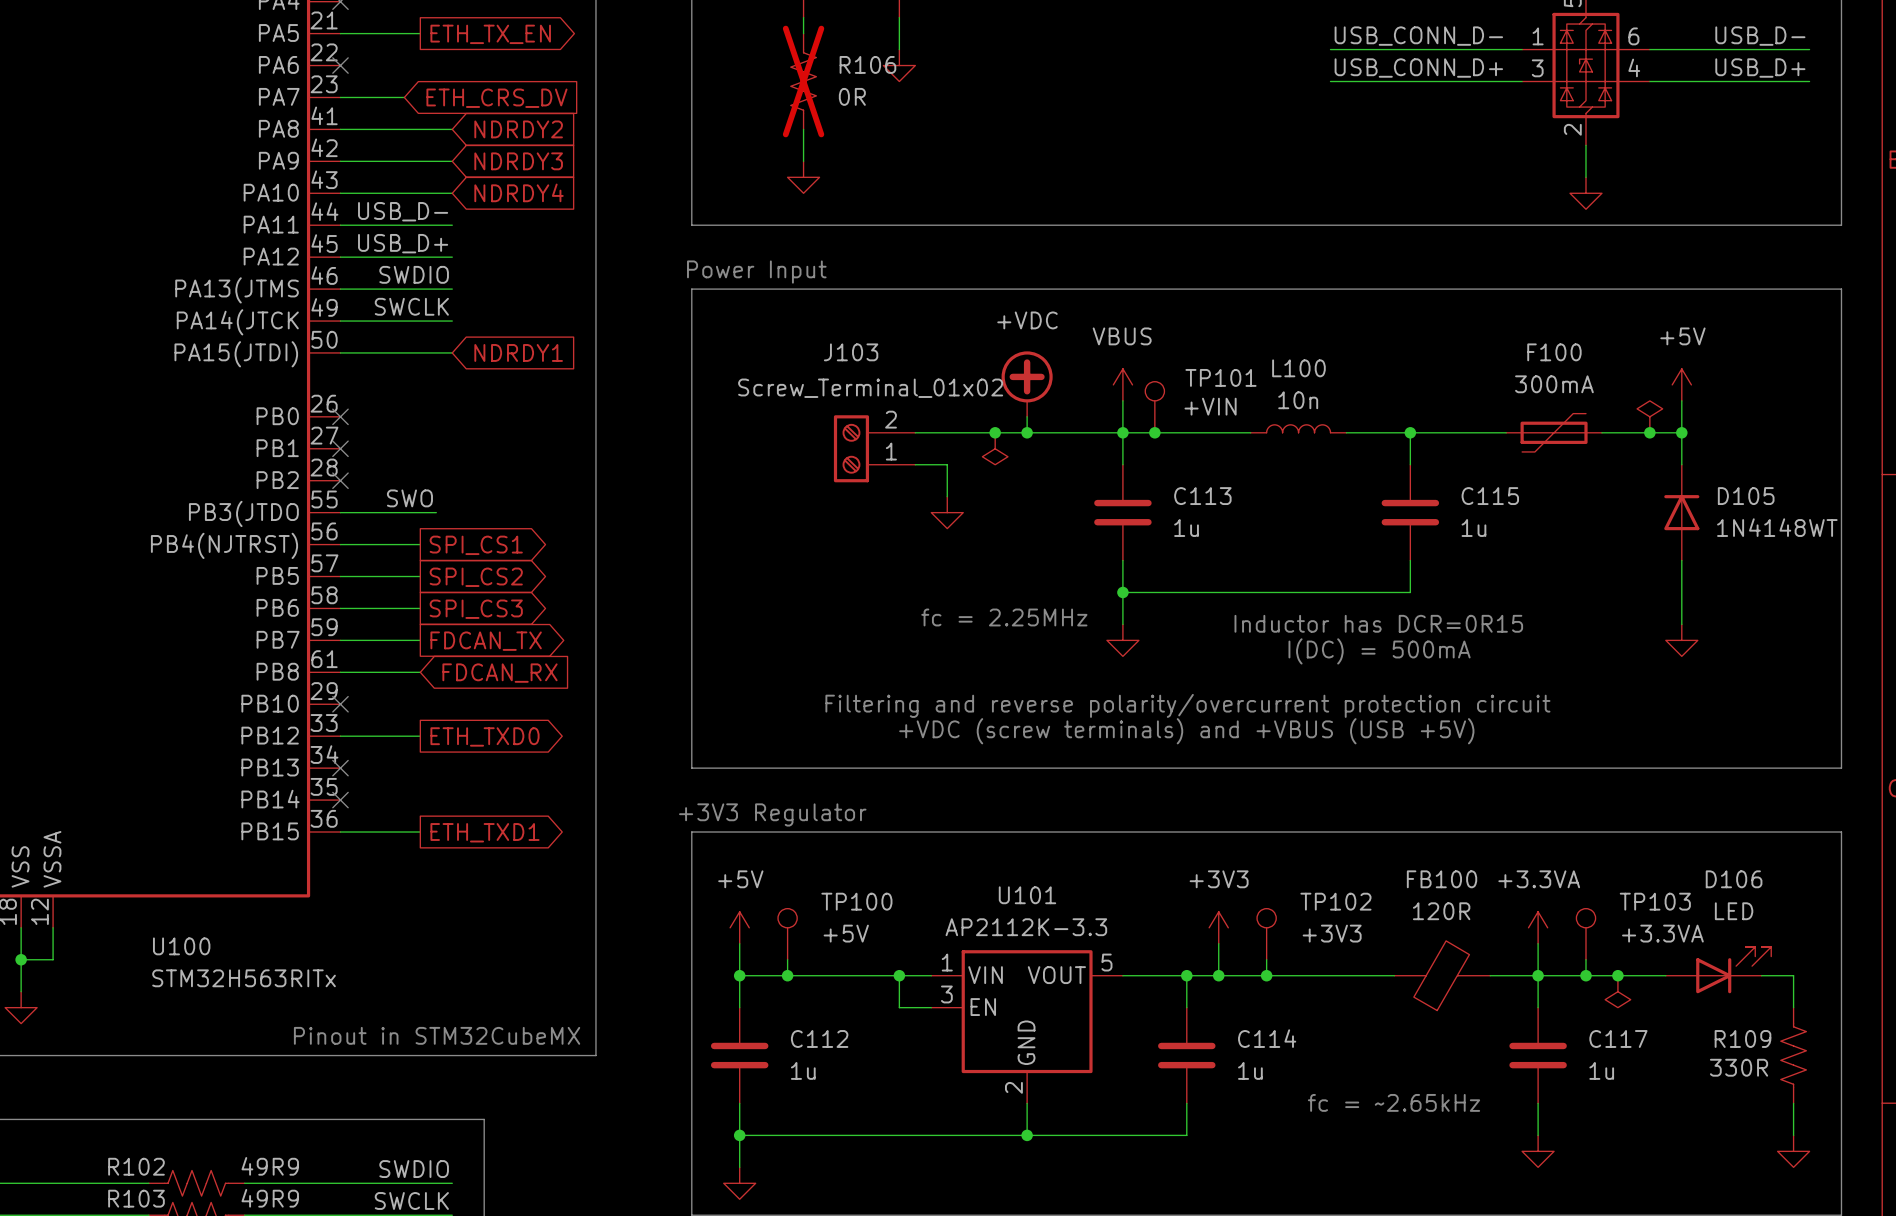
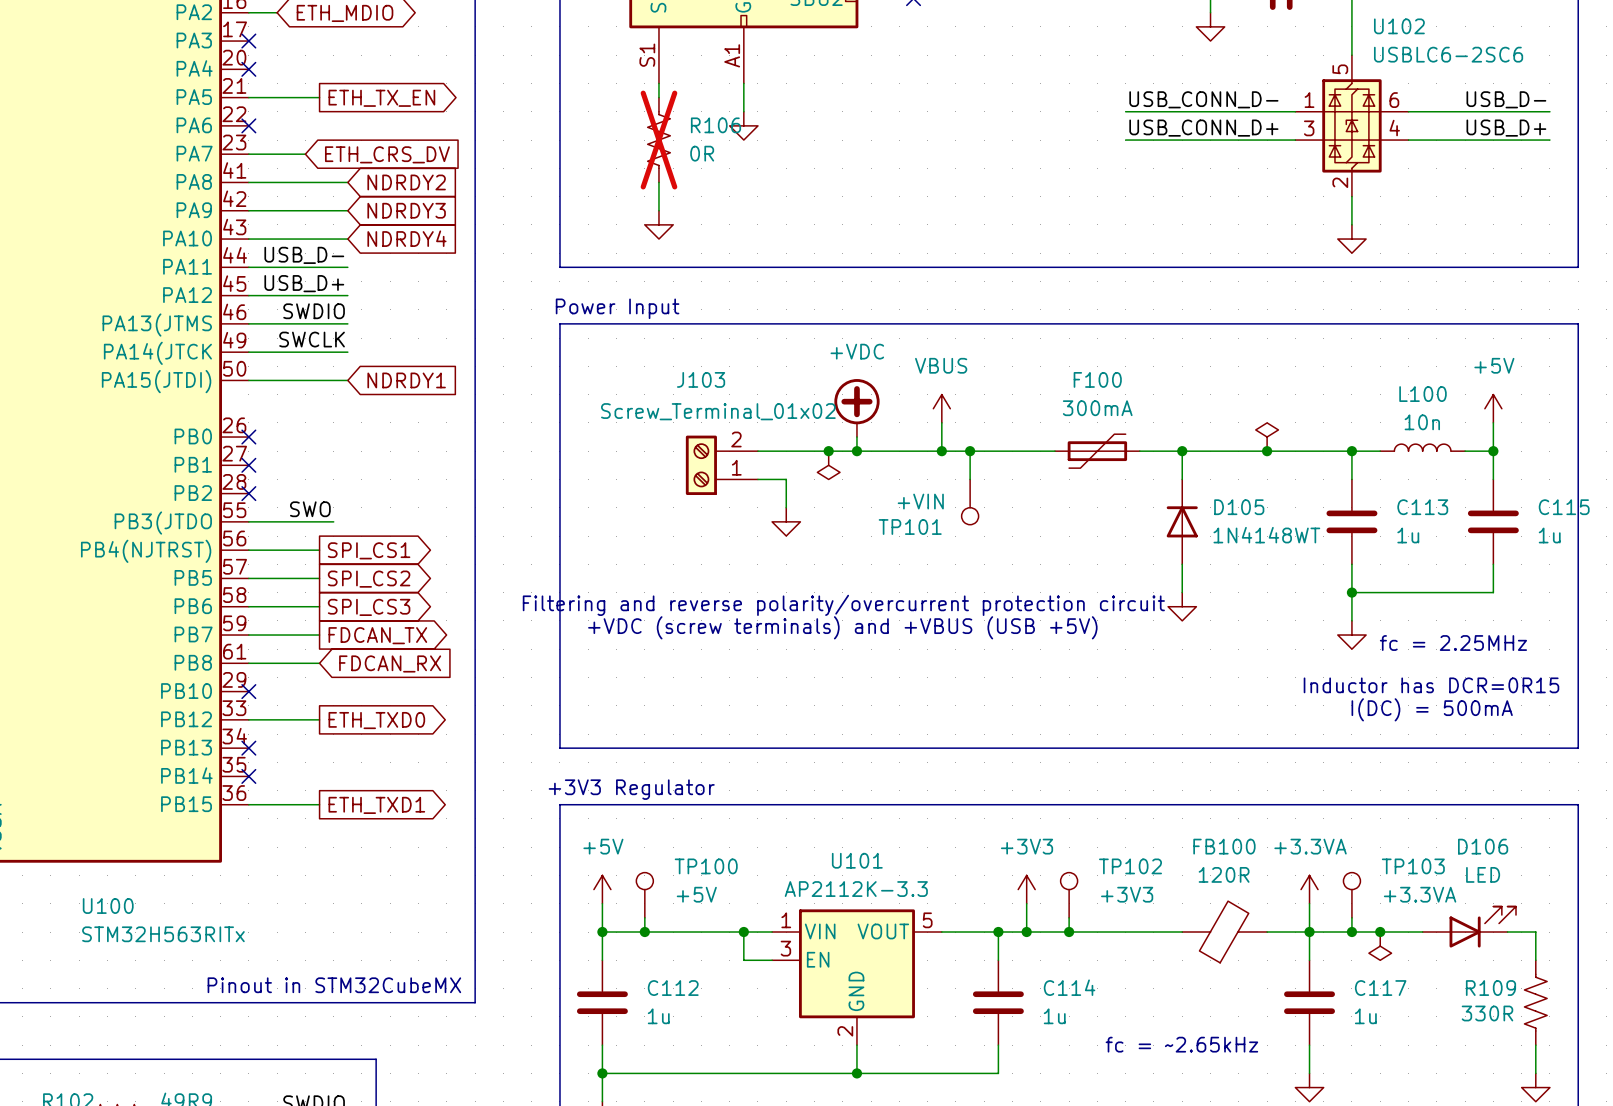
power symbol position: +5V (1681, 384) -> +5V (1493, 408)
TP101 rotation: 0° (1154, 391) -> 180° (970, 516)
wire: (1681, 400) (1681, 464) -> (1493, 422) (1493, 479)
TP101 position: (1154, 407) -> (970, 502)
power symbol position: (1649, 416) -> (1267, 437)
L100 position: (1298, 428) -> (1422, 447)
wire: (1122, 432) (1122, 464) -> (970, 451) (970, 479)
wire: (1410, 432) (1410, 464) -> (1182, 451) (1182, 479)
junction position: (1410, 432) -> (1182, 451)
junction: none -> (1267, 451)
F100 position: (1554, 432) -> (1097, 451)
wire: none -> (1351, 451) (1351, 479)
junction: none -> (1351, 451)
wire: (1617, 432) (1681, 432) -> none
junction: (1649, 432) -> none
junction: (1681, 432) -> none
wire: none -> (1465, 451) (1493, 451)
junction: none -> (1493, 451)
C113 position: (1122, 512) -> (1351, 521)
C115 position: (1410, 512) -> (1493, 521)
D105 position: (1681, 512) -> (1182, 521)
wire: (1122, 560) (1122, 624) -> none
wire: none -> (1182, 564) (1182, 592)
wire: (1410, 560) (1410, 592) (1122, 592) -> none
wire: (1681, 560) (1681, 624) -> (1351, 564) (1351, 620)
wire: none -> (1493, 564) (1493, 592) (1351, 592)
junction: (1122, 592) -> none
junction: none -> (1351, 592)
power symbol: none -> (1182, 606)
text: fc = 2.25MHz (1004, 617) -> none
text position: Inductor has DCR=0R15 (1378, 623) -> Inductor has DCR=0R15 (1431, 685)
power symbol: (1122, 640) -> none
power symbol position: (1681, 640) -> (1351, 635)
text: none -> fc = 2.25MHz (1453, 643)
text position: I(DC) = 500mA (1379, 651) -> I(DC) = 500mA (1432, 709)
text position: Filtering and reverse polarity/overcurrent protection circuit (1187, 705) -> Filtering and reverse polarity/overcurrent protection circuit (843, 605)
text position: +VDC (screw terminals) and +VBUS (USB +5V) (1186, 731) -> +VDC (screw terminals) and +VBUS (USB +5V) (842, 627)

